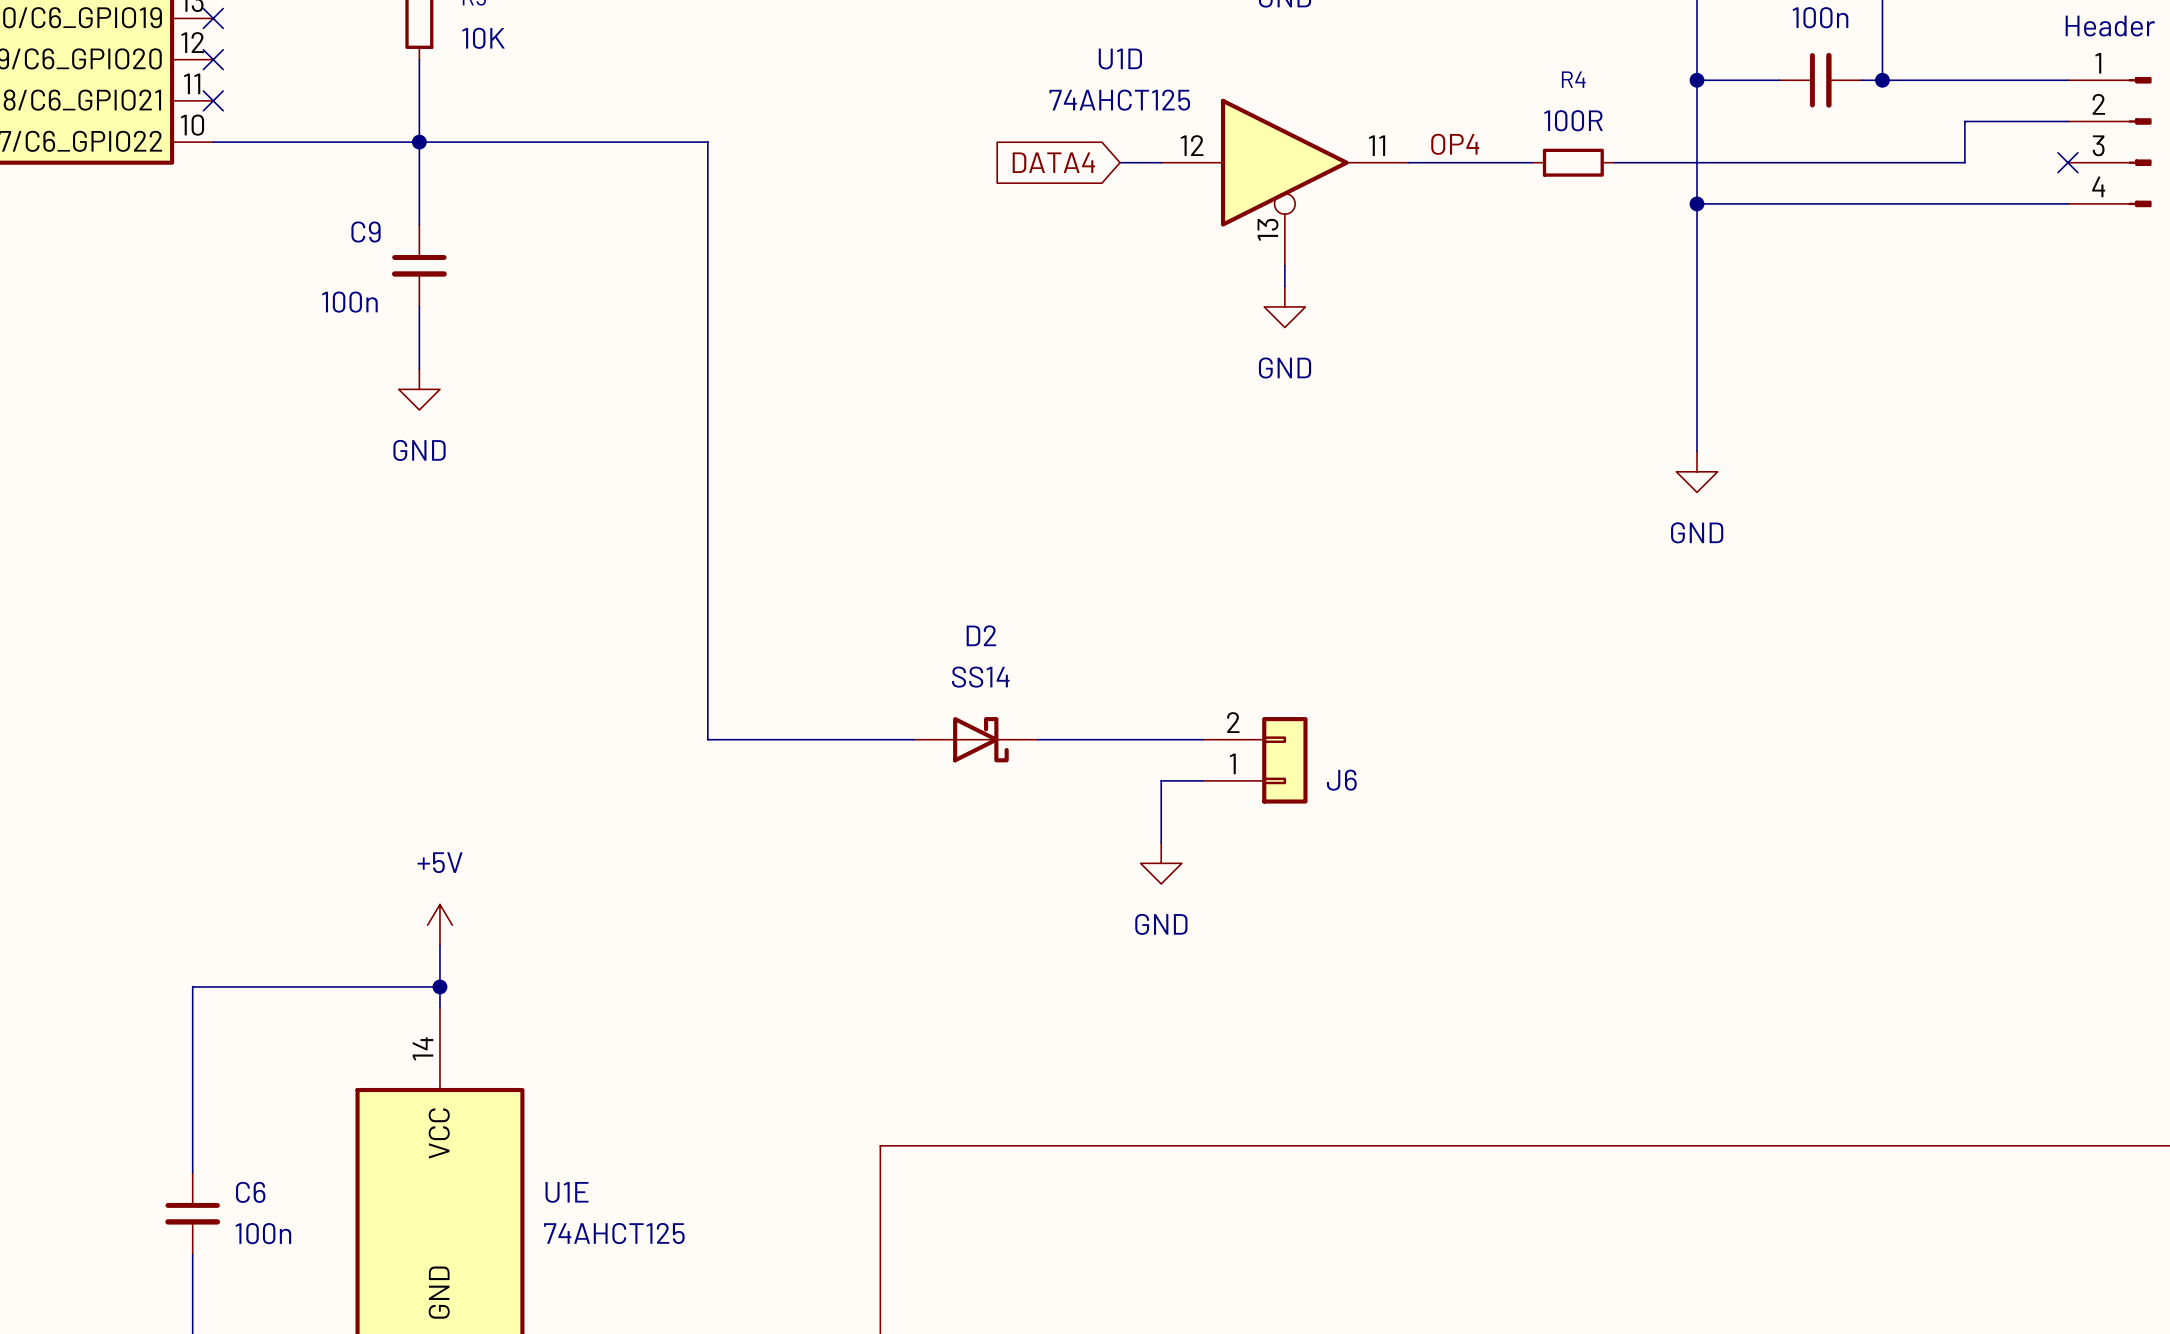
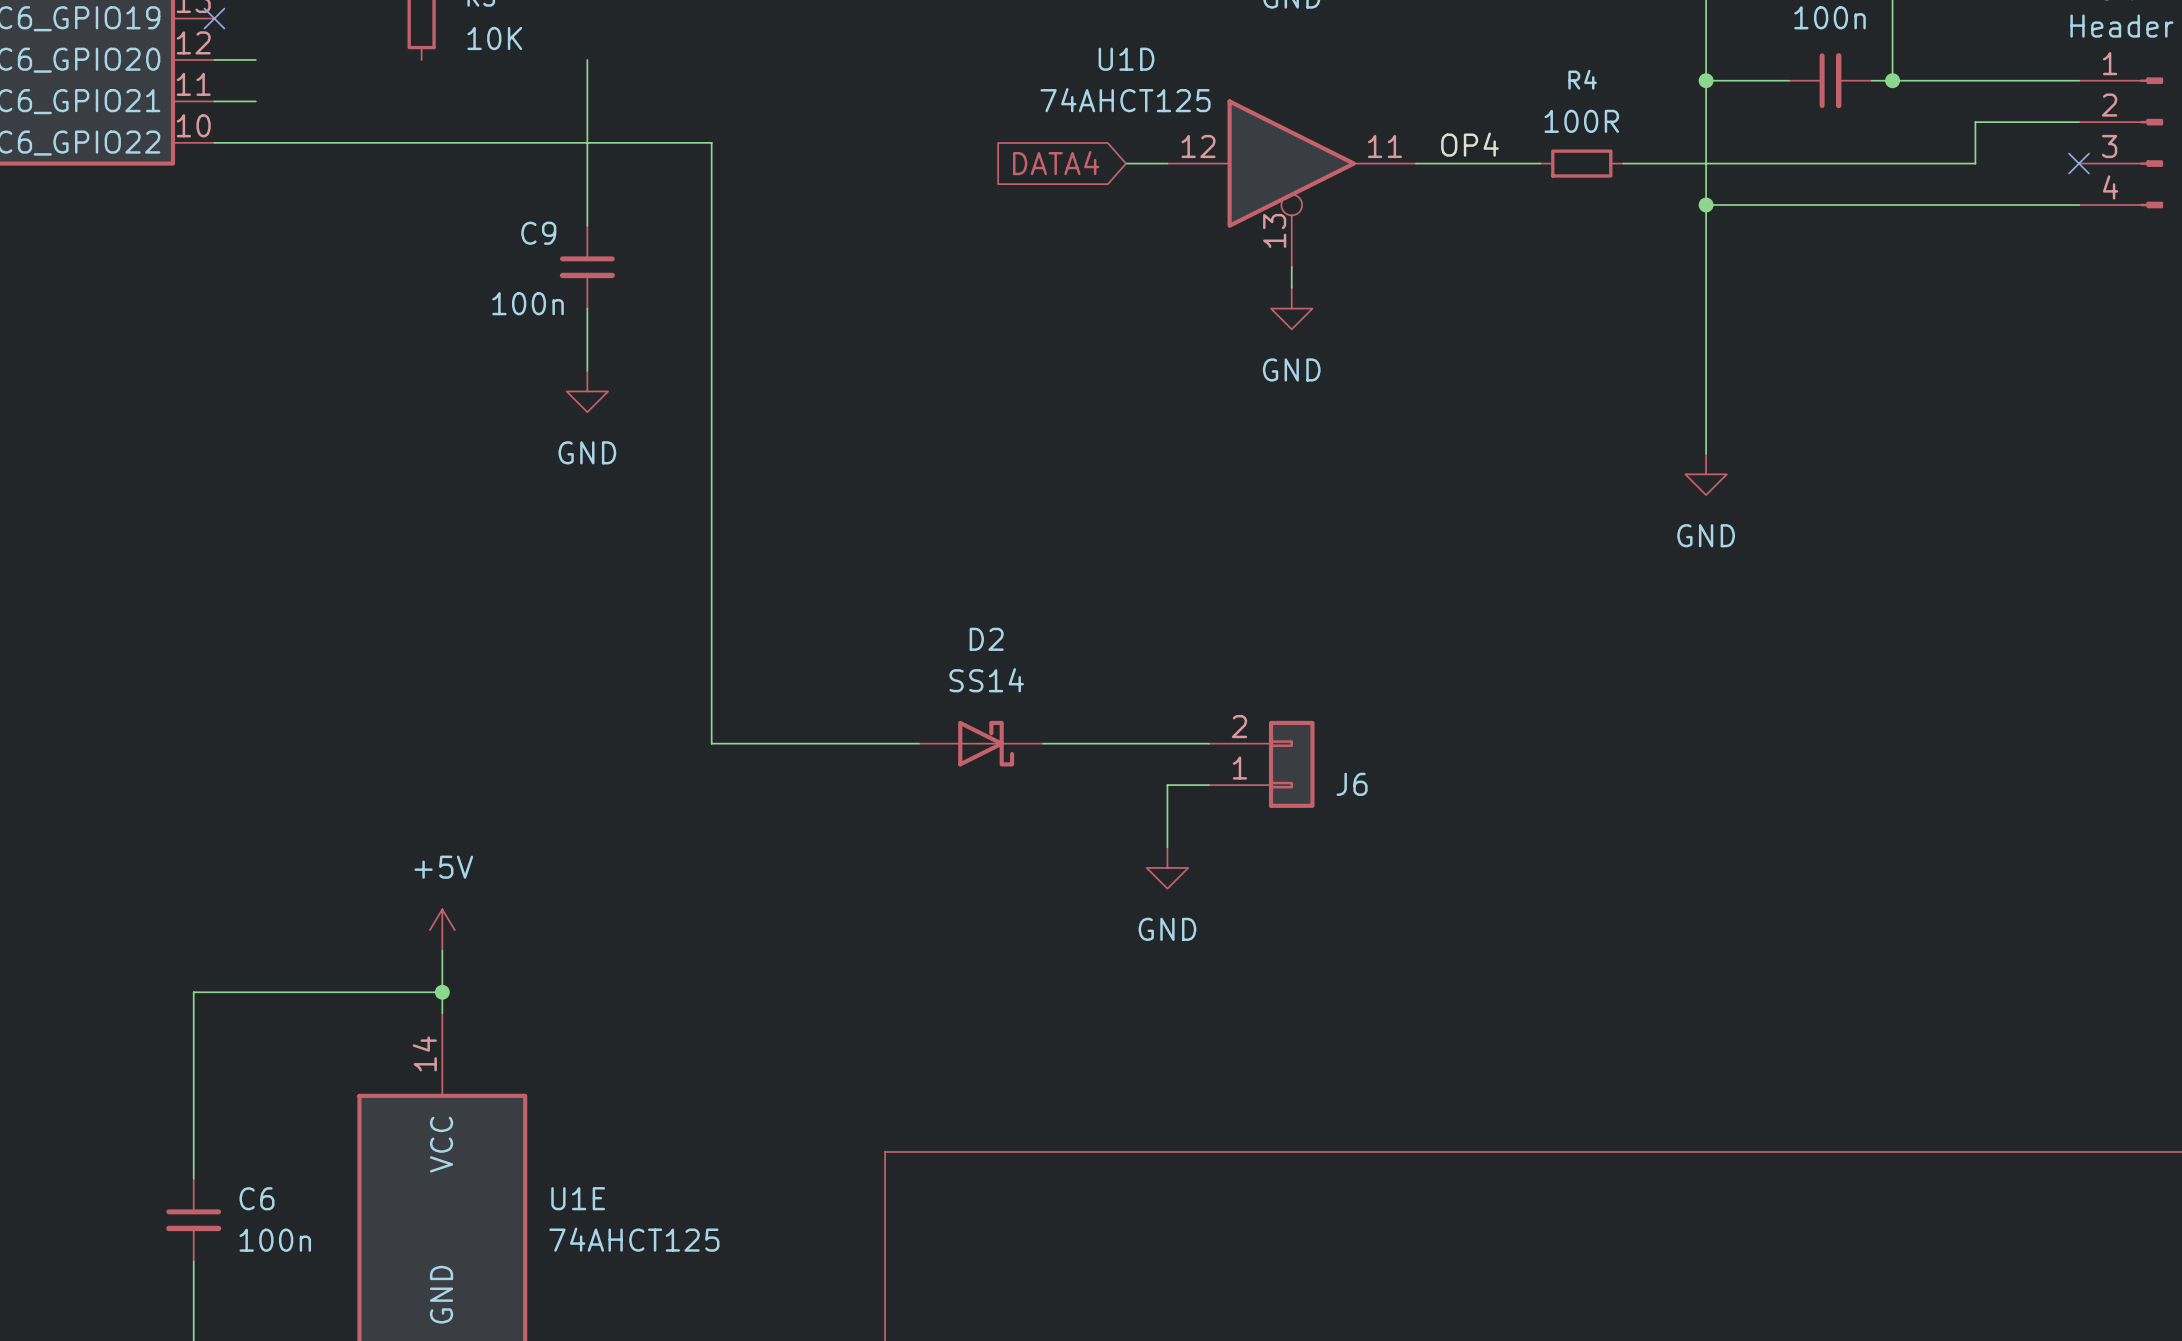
wire: none -> (214, 59) (255, 59)
no-connect mark: (213, 59) -> none
wire: (419, 59) (419, 224) -> (587, 59) (587, 225)
wire: none -> (214, 101) (255, 101)
no-connect mark: (213, 100) -> none
junction: (419, 142) -> none
C9 position: (419, 265) -> (587, 267)
wire: (419, 306) (419, 368) -> (587, 308) (587, 370)
power symbol position: GND (419, 389) -> GND (587, 391)

